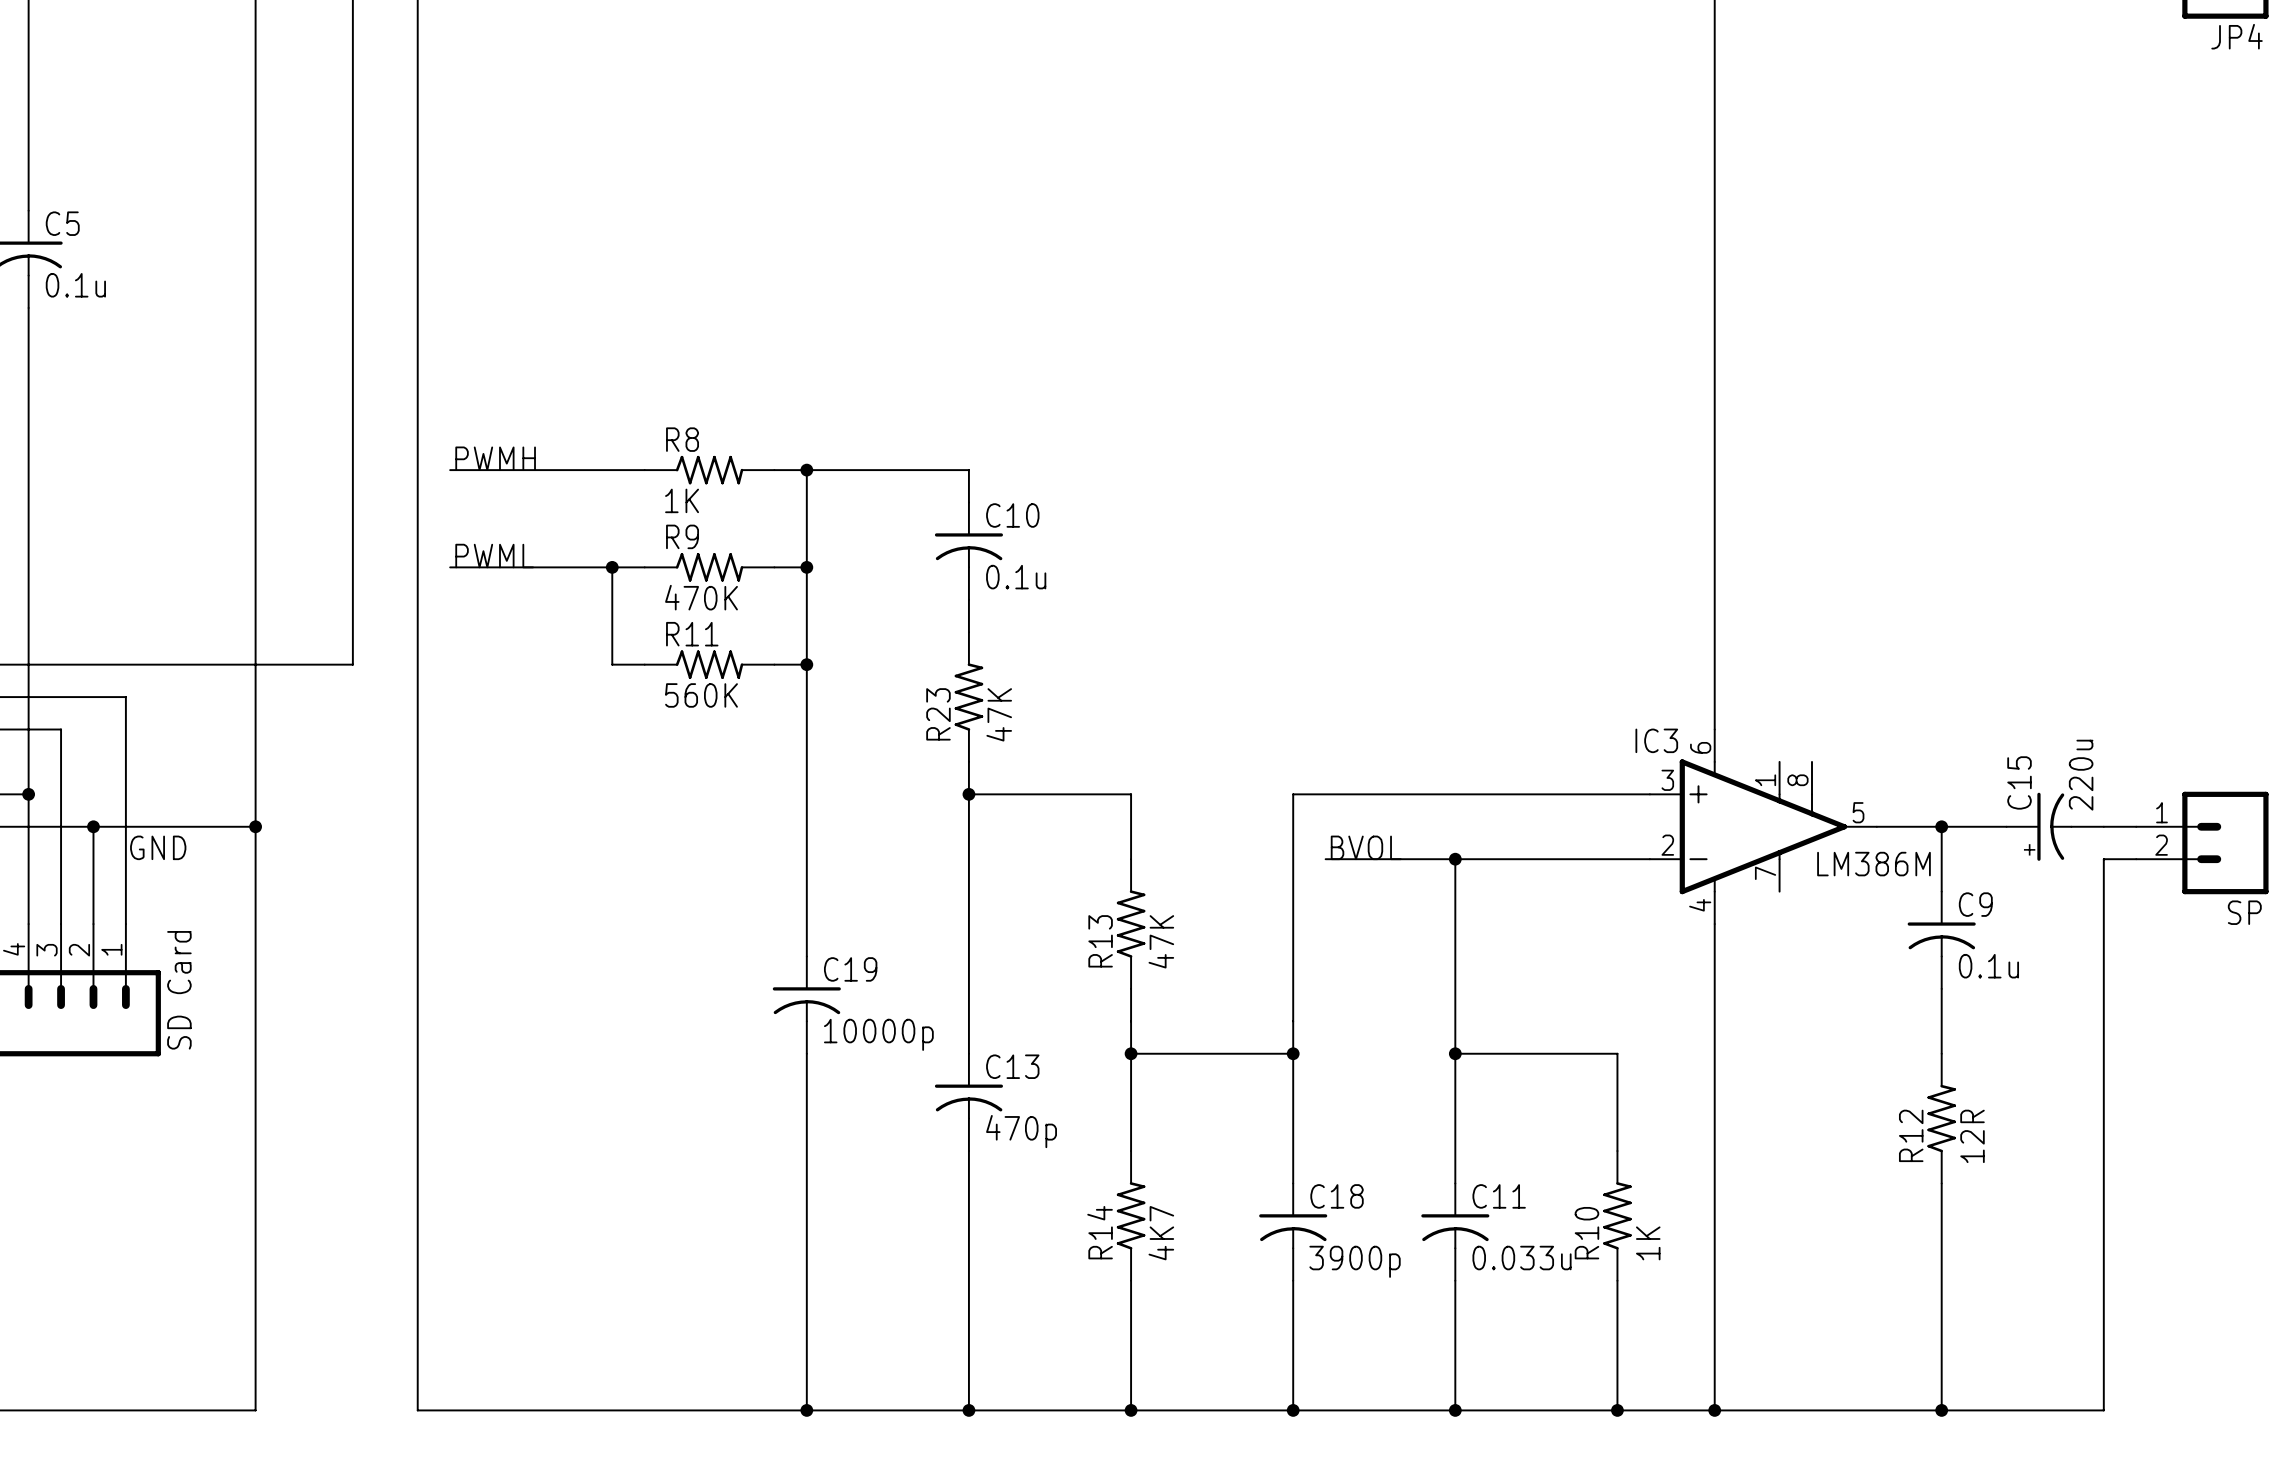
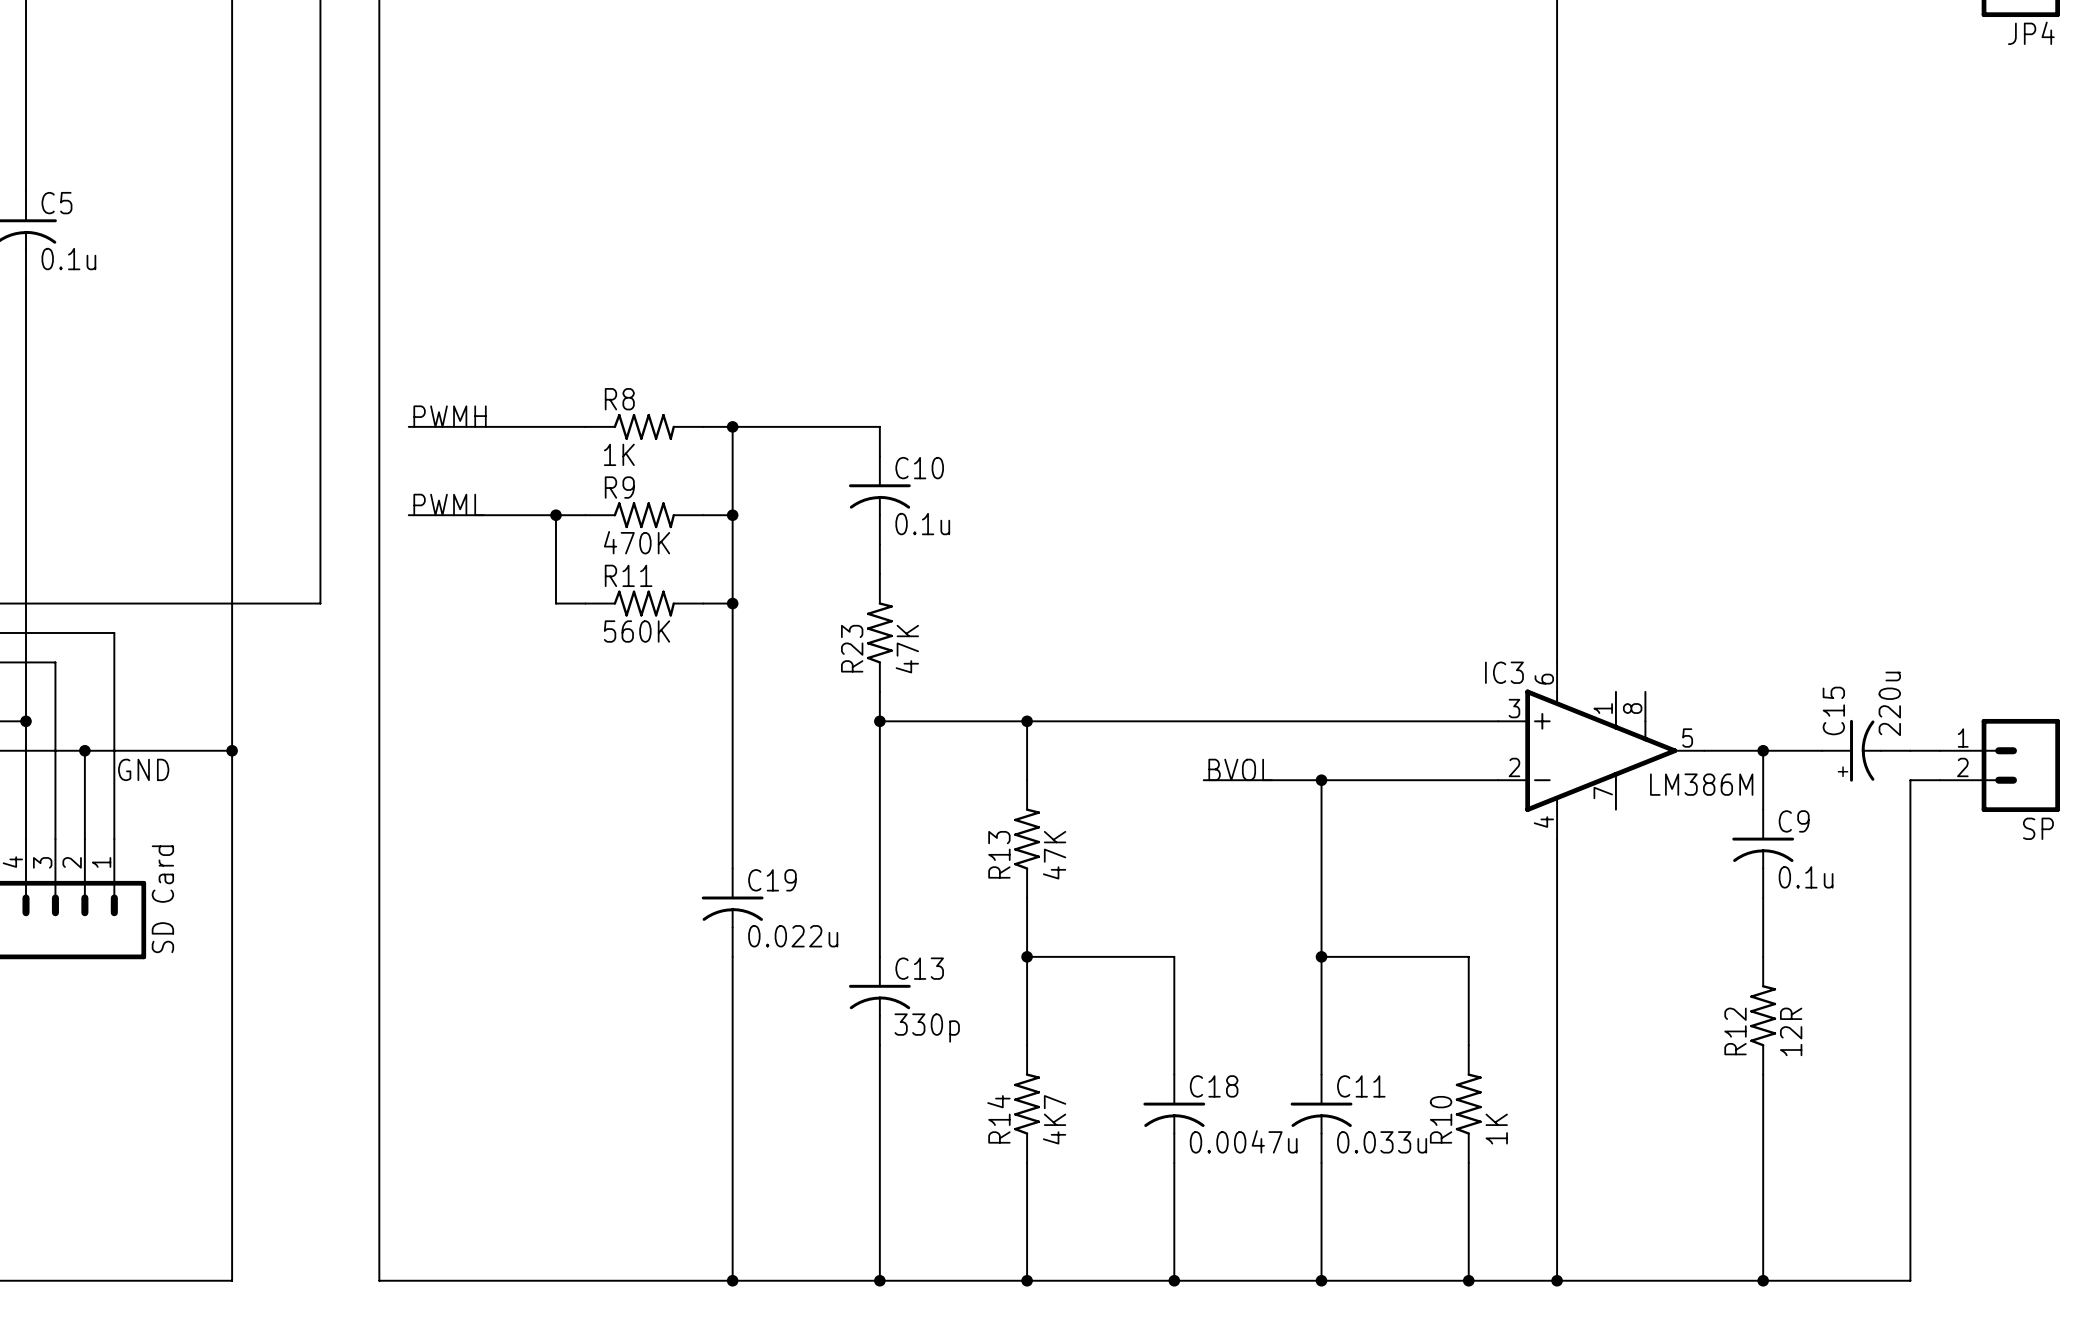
junction: none -> (1027, 721)
wire: (1293, 794) (1293, 1053) -> (1174, 721) (1027, 721)
C19 value: 10000p (878, 1034) -> 0.022u (793, 936)
junction: (1293, 1053) -> none
C13 value: 470p (1021, 1131) -> 330p (927, 1028)
C18 value: 3900p (1355, 1261) -> 0.0047u (1243, 1141)

